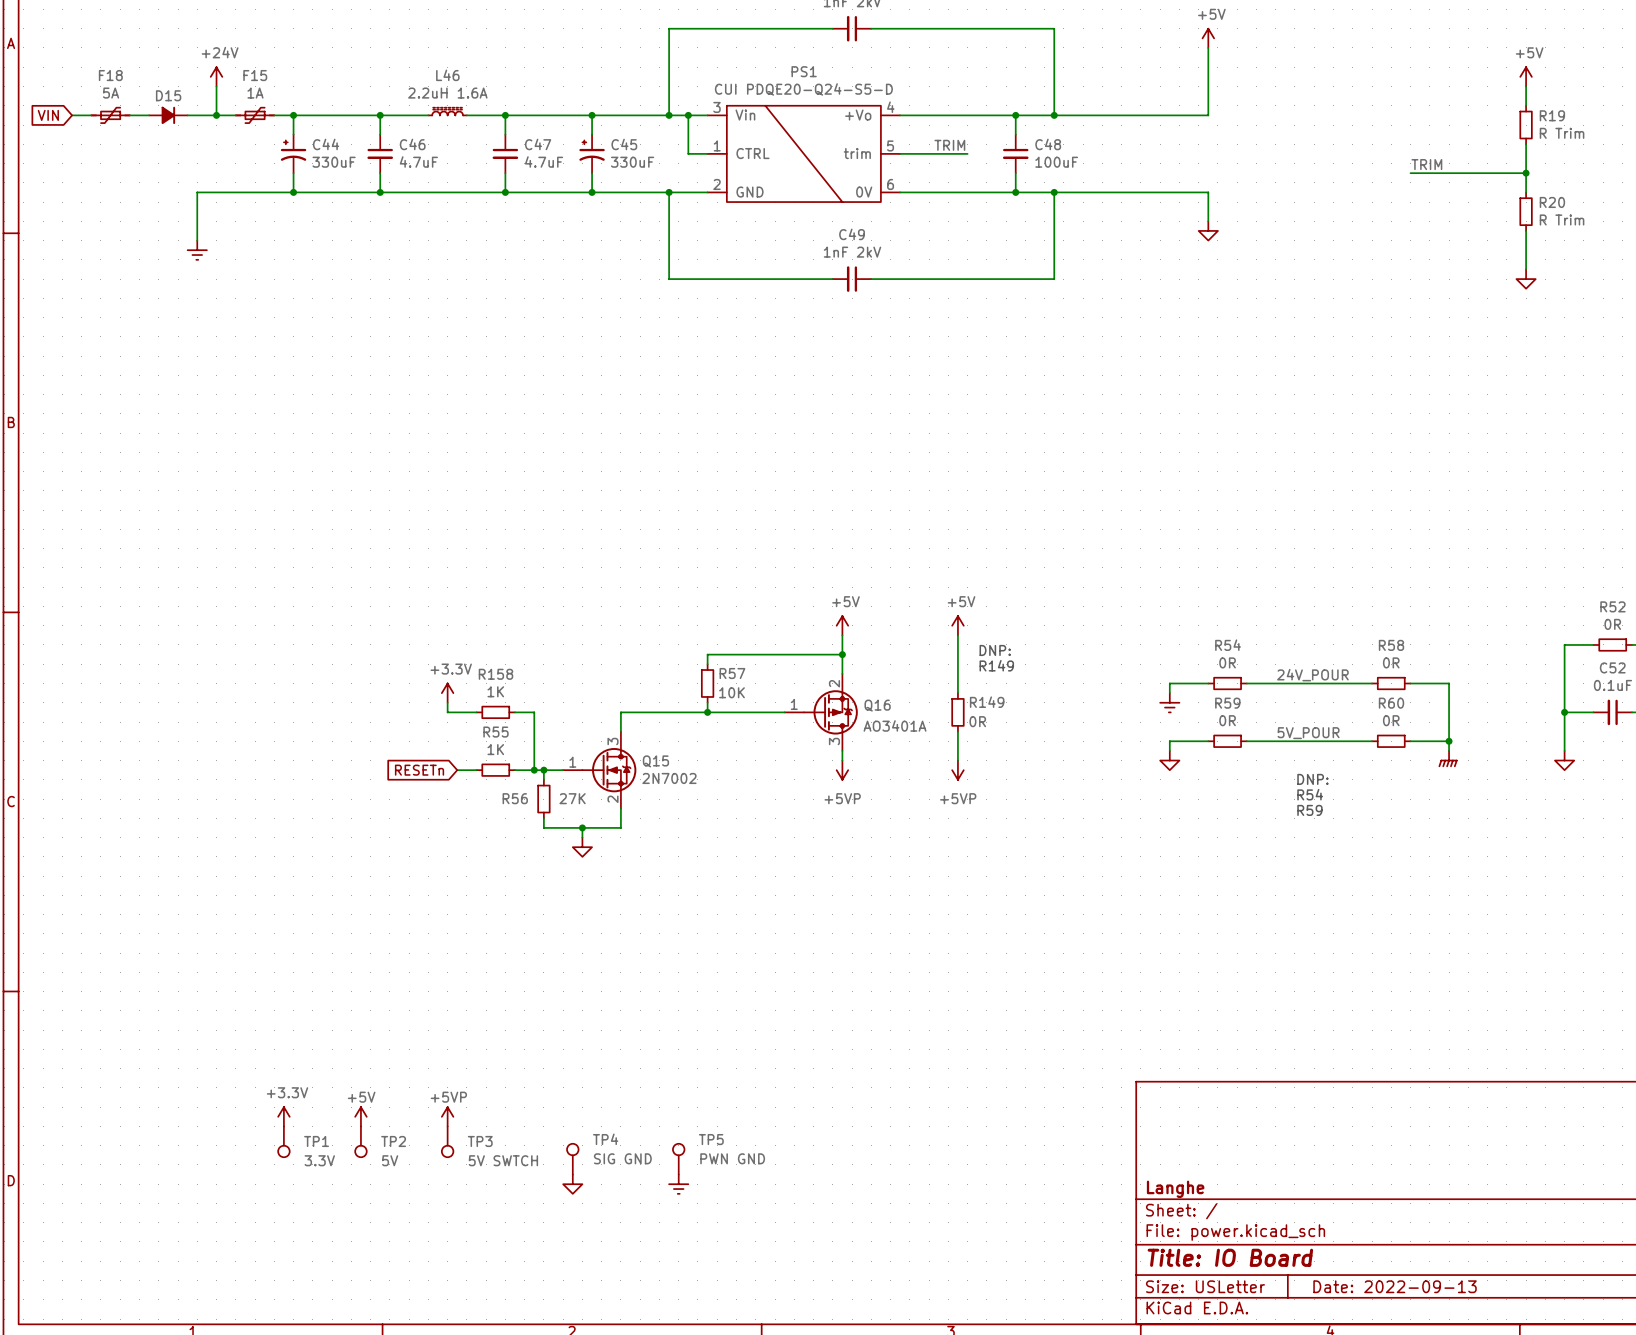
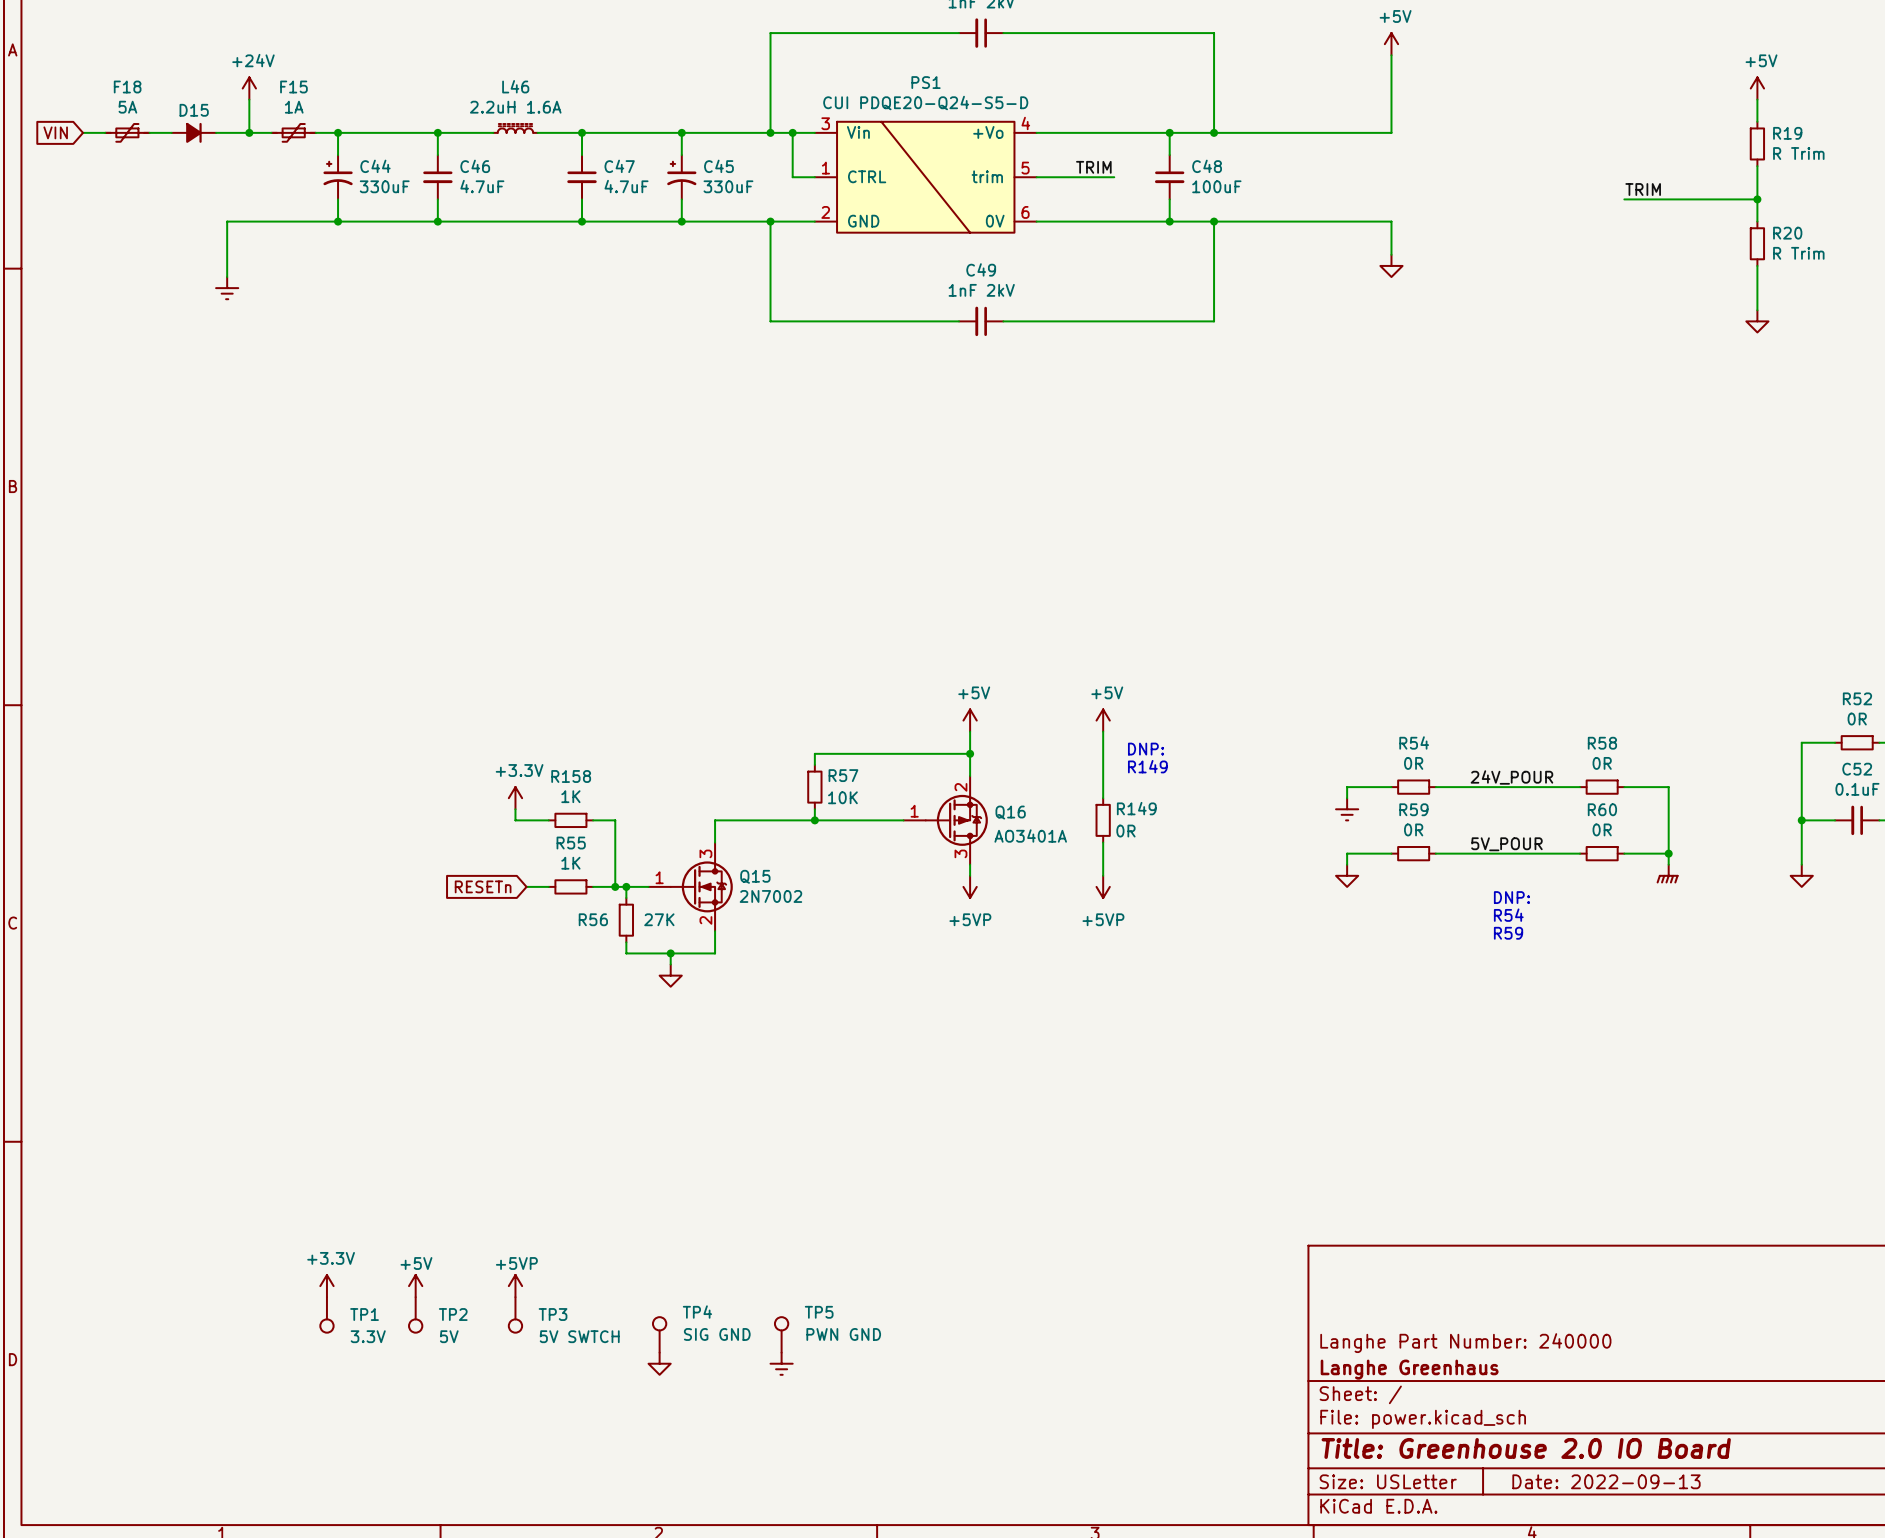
title block: none -> Langhe Part Number: 240000 (1465, 1343)
title block: Langhe (1175, 1189) -> Langhe Greenhaus (1409, 1369)
title block: Title: IO Board (1230, 1257) -> Title: Greenhouse 2.0 IO Board (1526, 1448)

